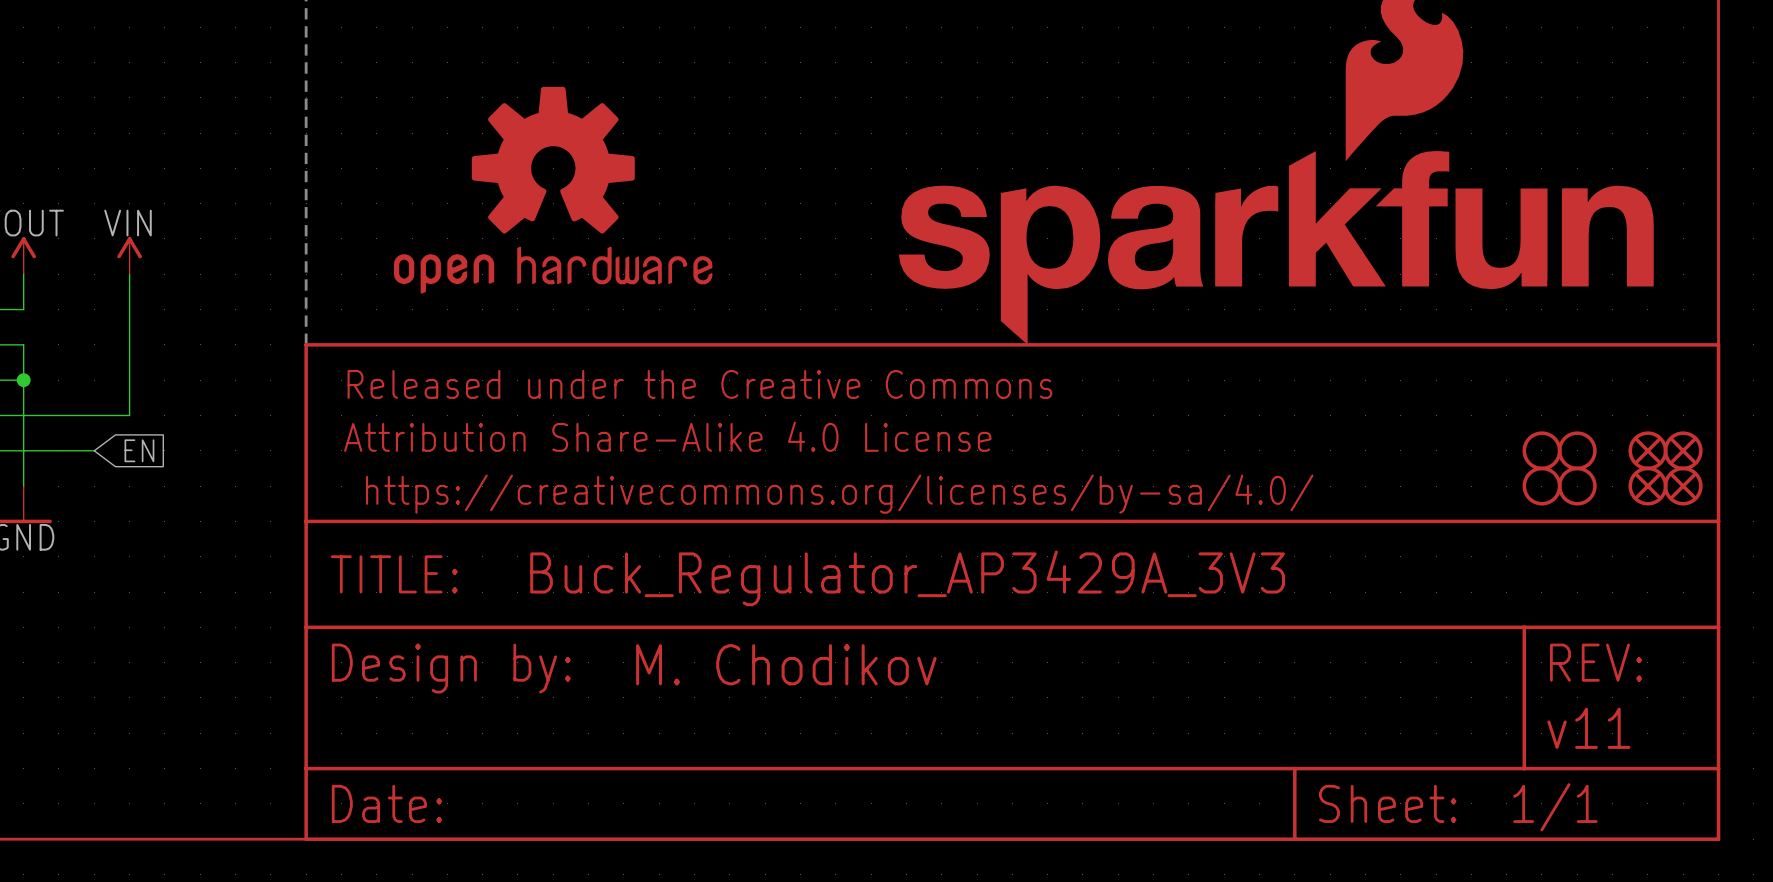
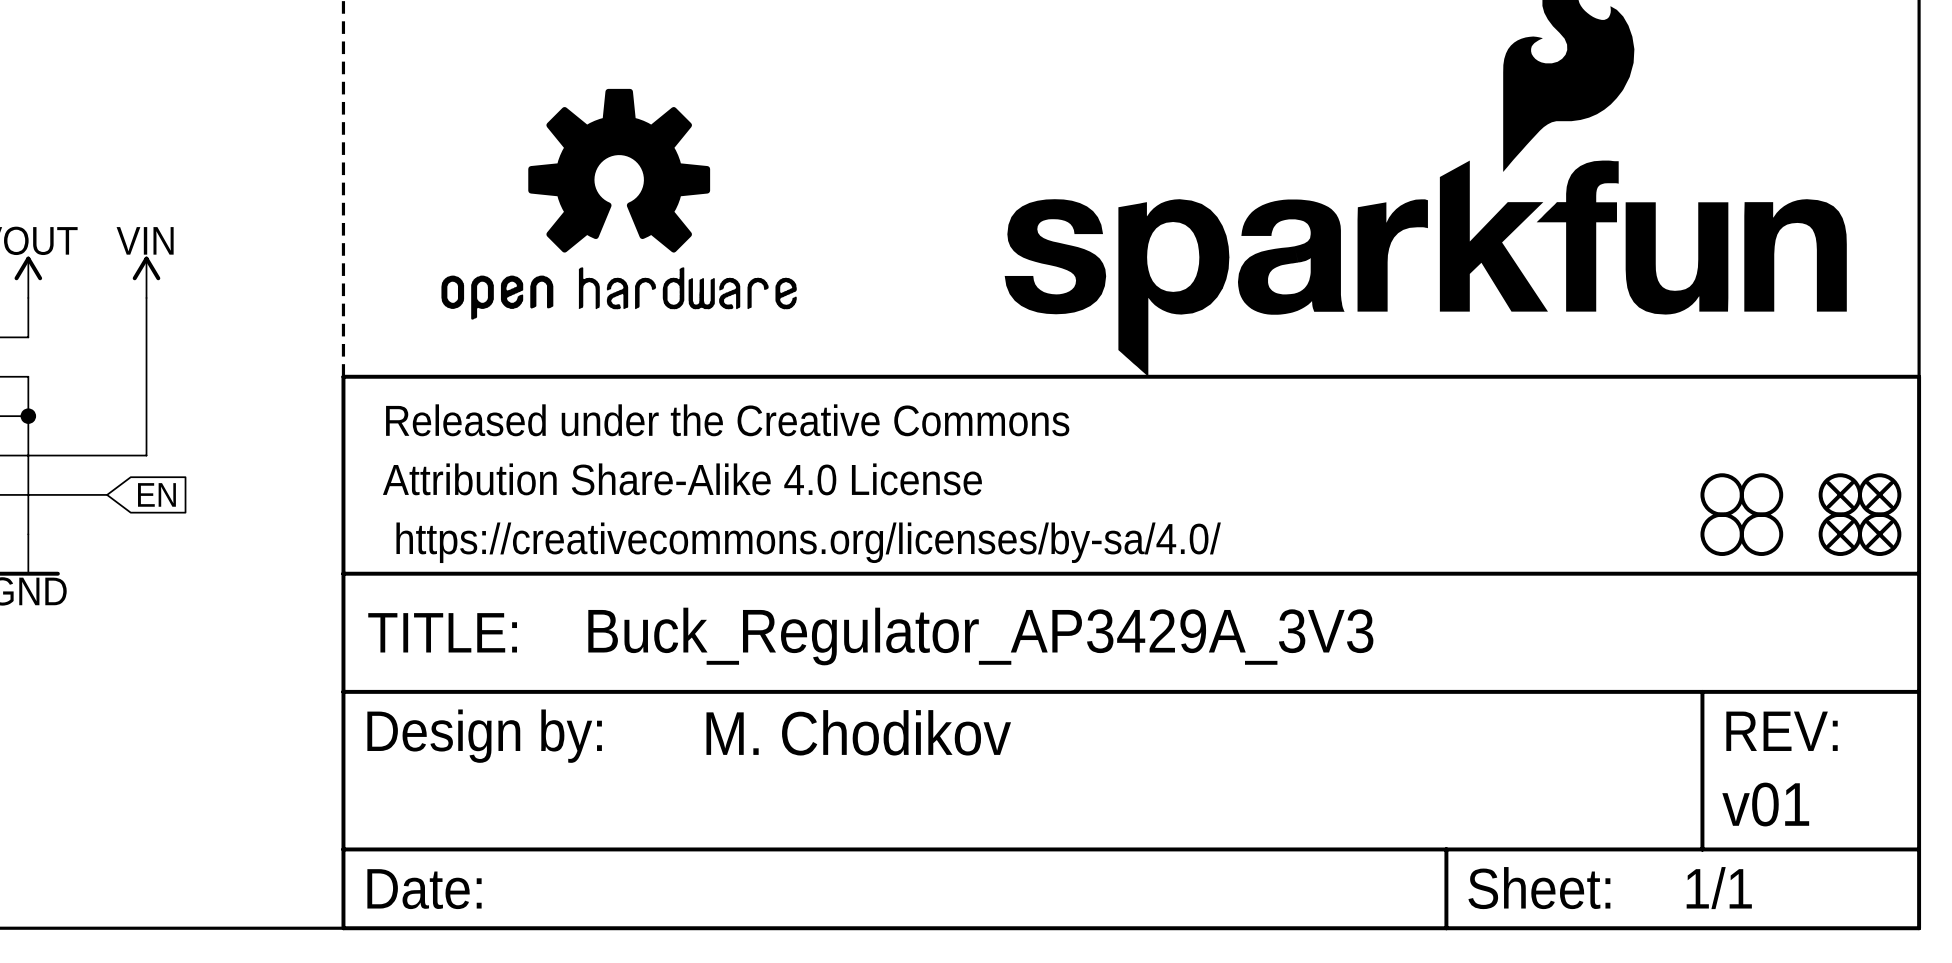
part text: v11 (1588, 728) -> v01 (1765, 804)

